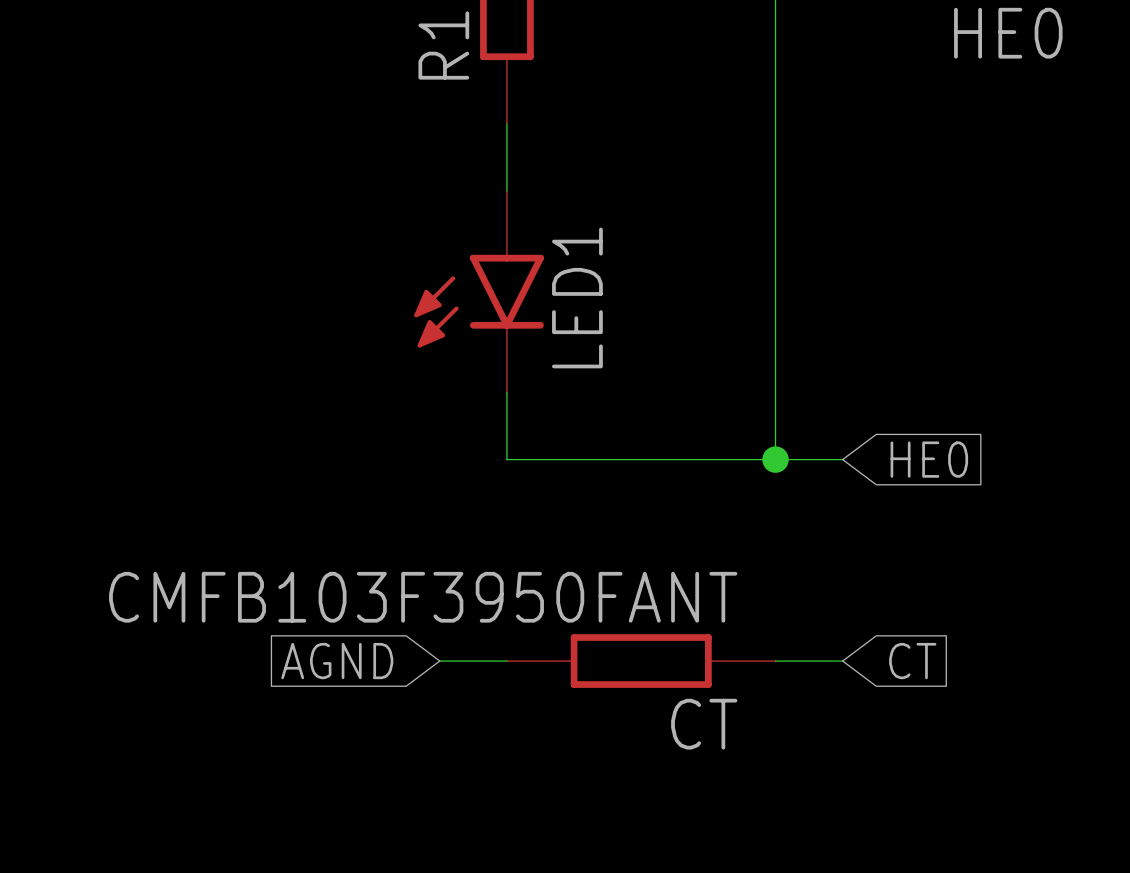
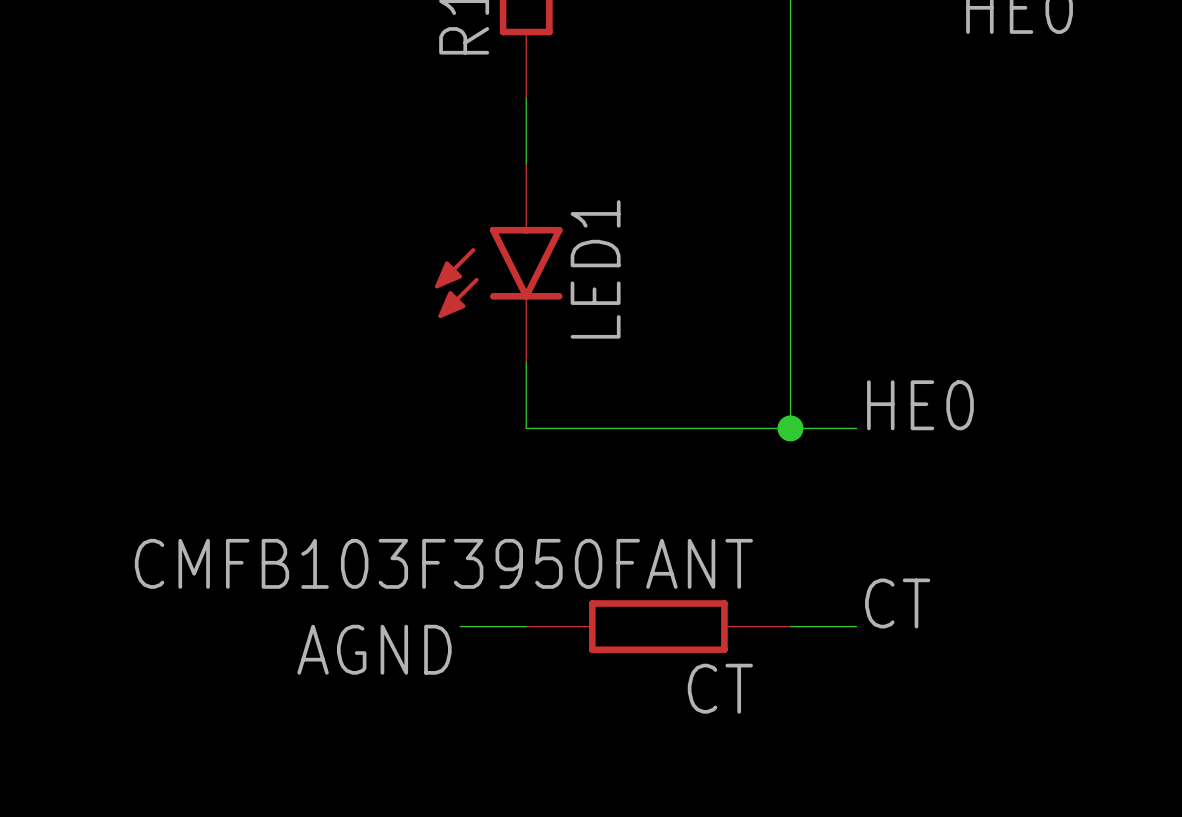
label: none -> HE0 (920, 405)
global label: HE0 (929, 459) -> none
label: none -> CT (897, 603)
global label: AGND (337, 661) -> none
global label: CT (912, 661) -> none
label: none -> AGND (374, 649)

